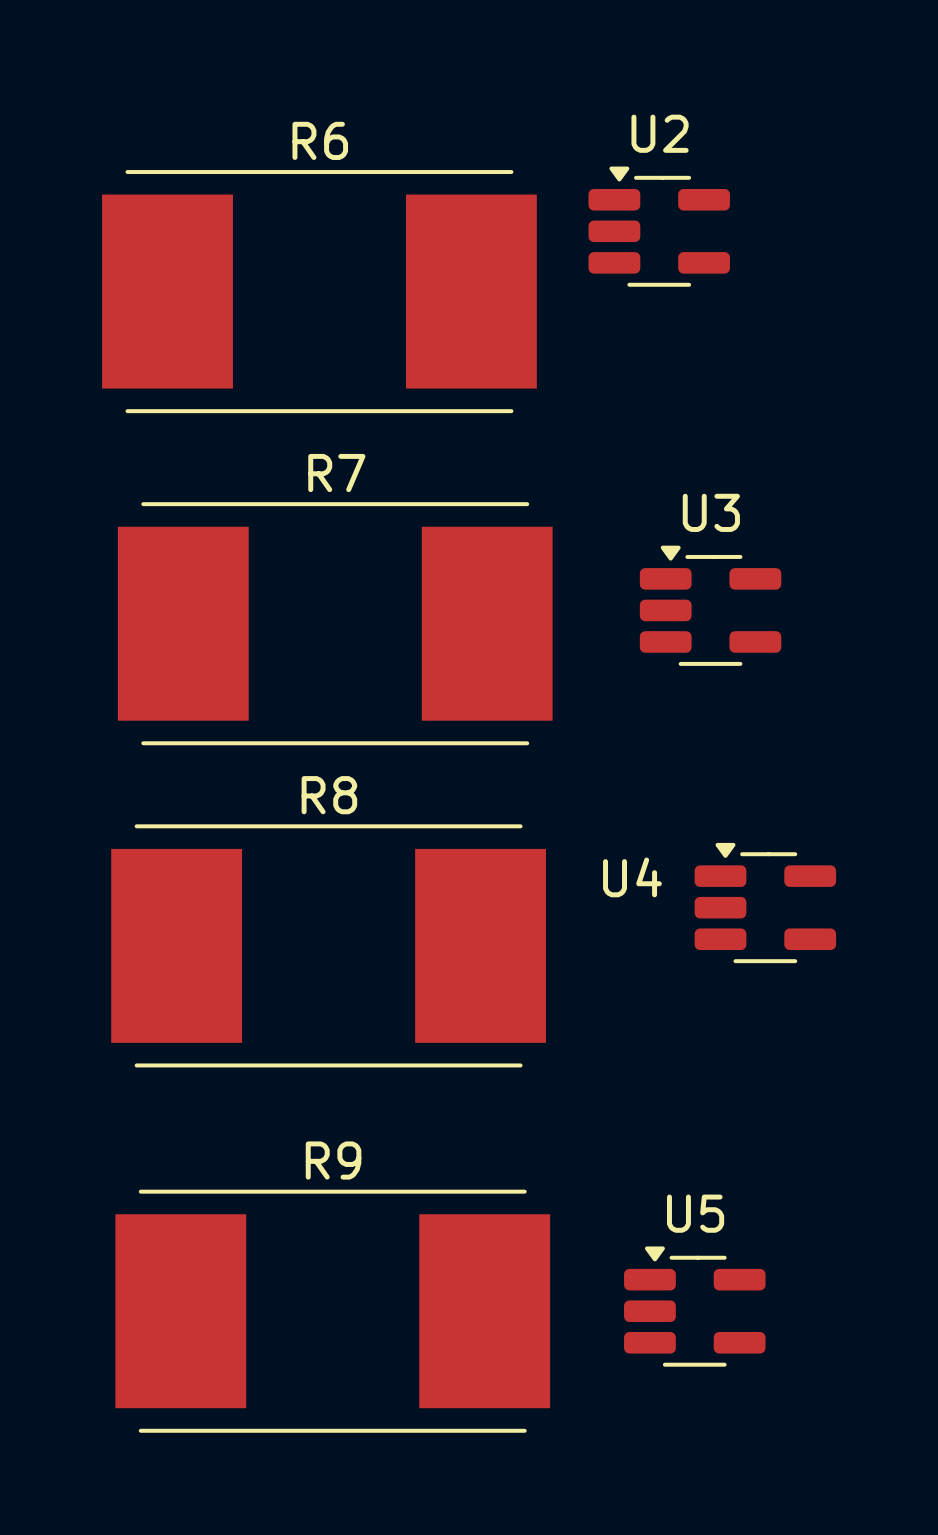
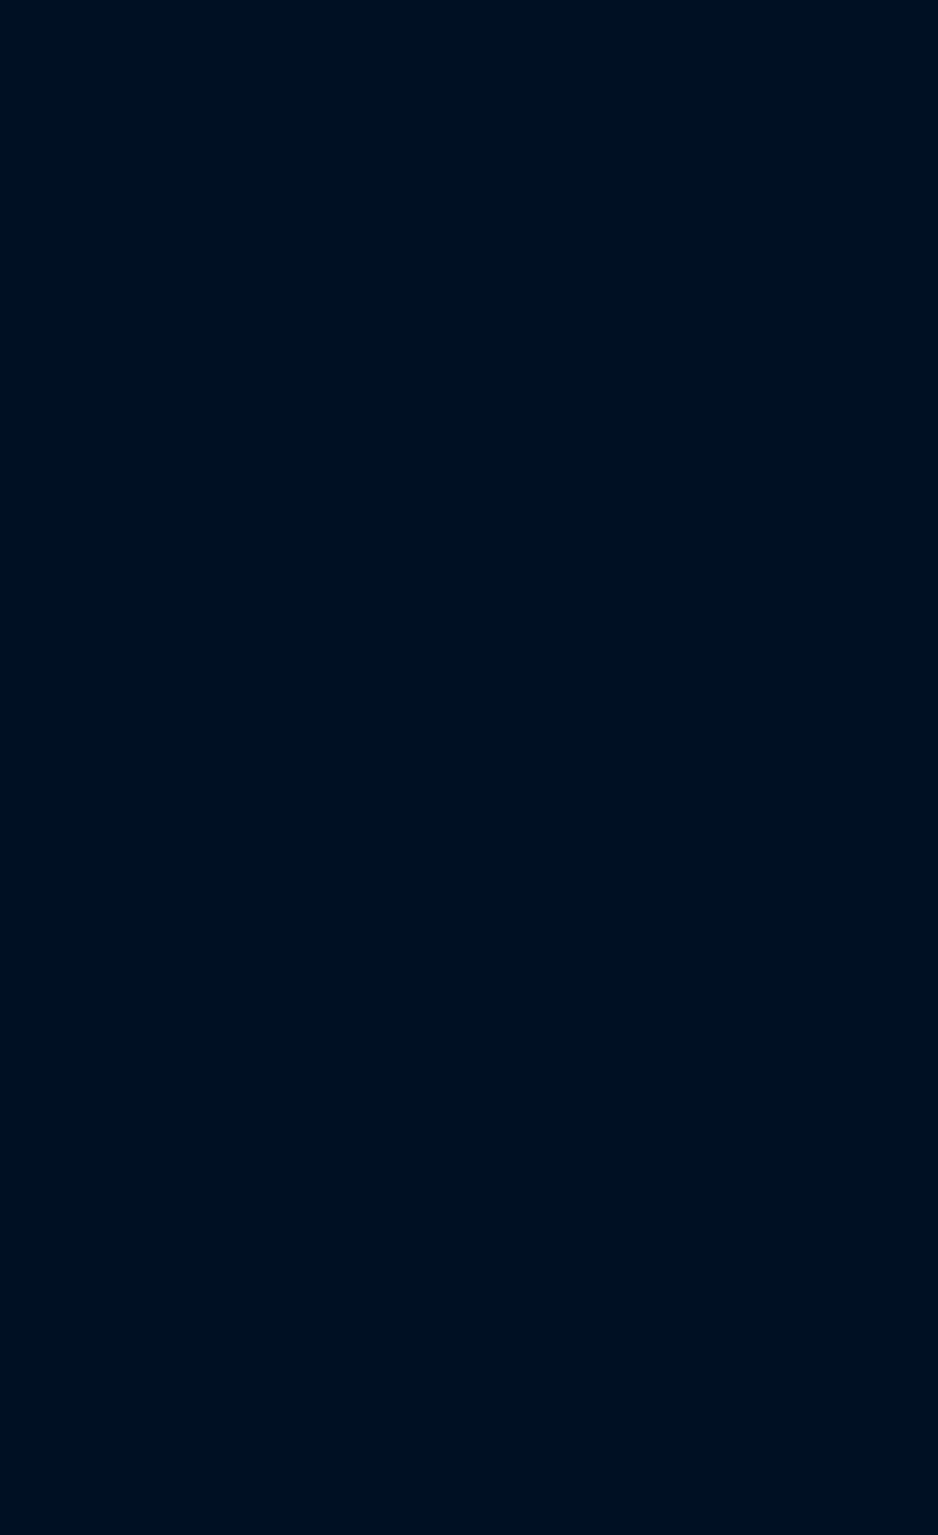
U2: (659, 226) -> none
R6: (319, 291) -> none
U3: (710, 605) -> none
R7: (335, 623) -> none
U4: (765, 903) -> none
R8: (328, 945) -> none
U5: (694, 1306) -> none
R9: (332, 1311) -> none

